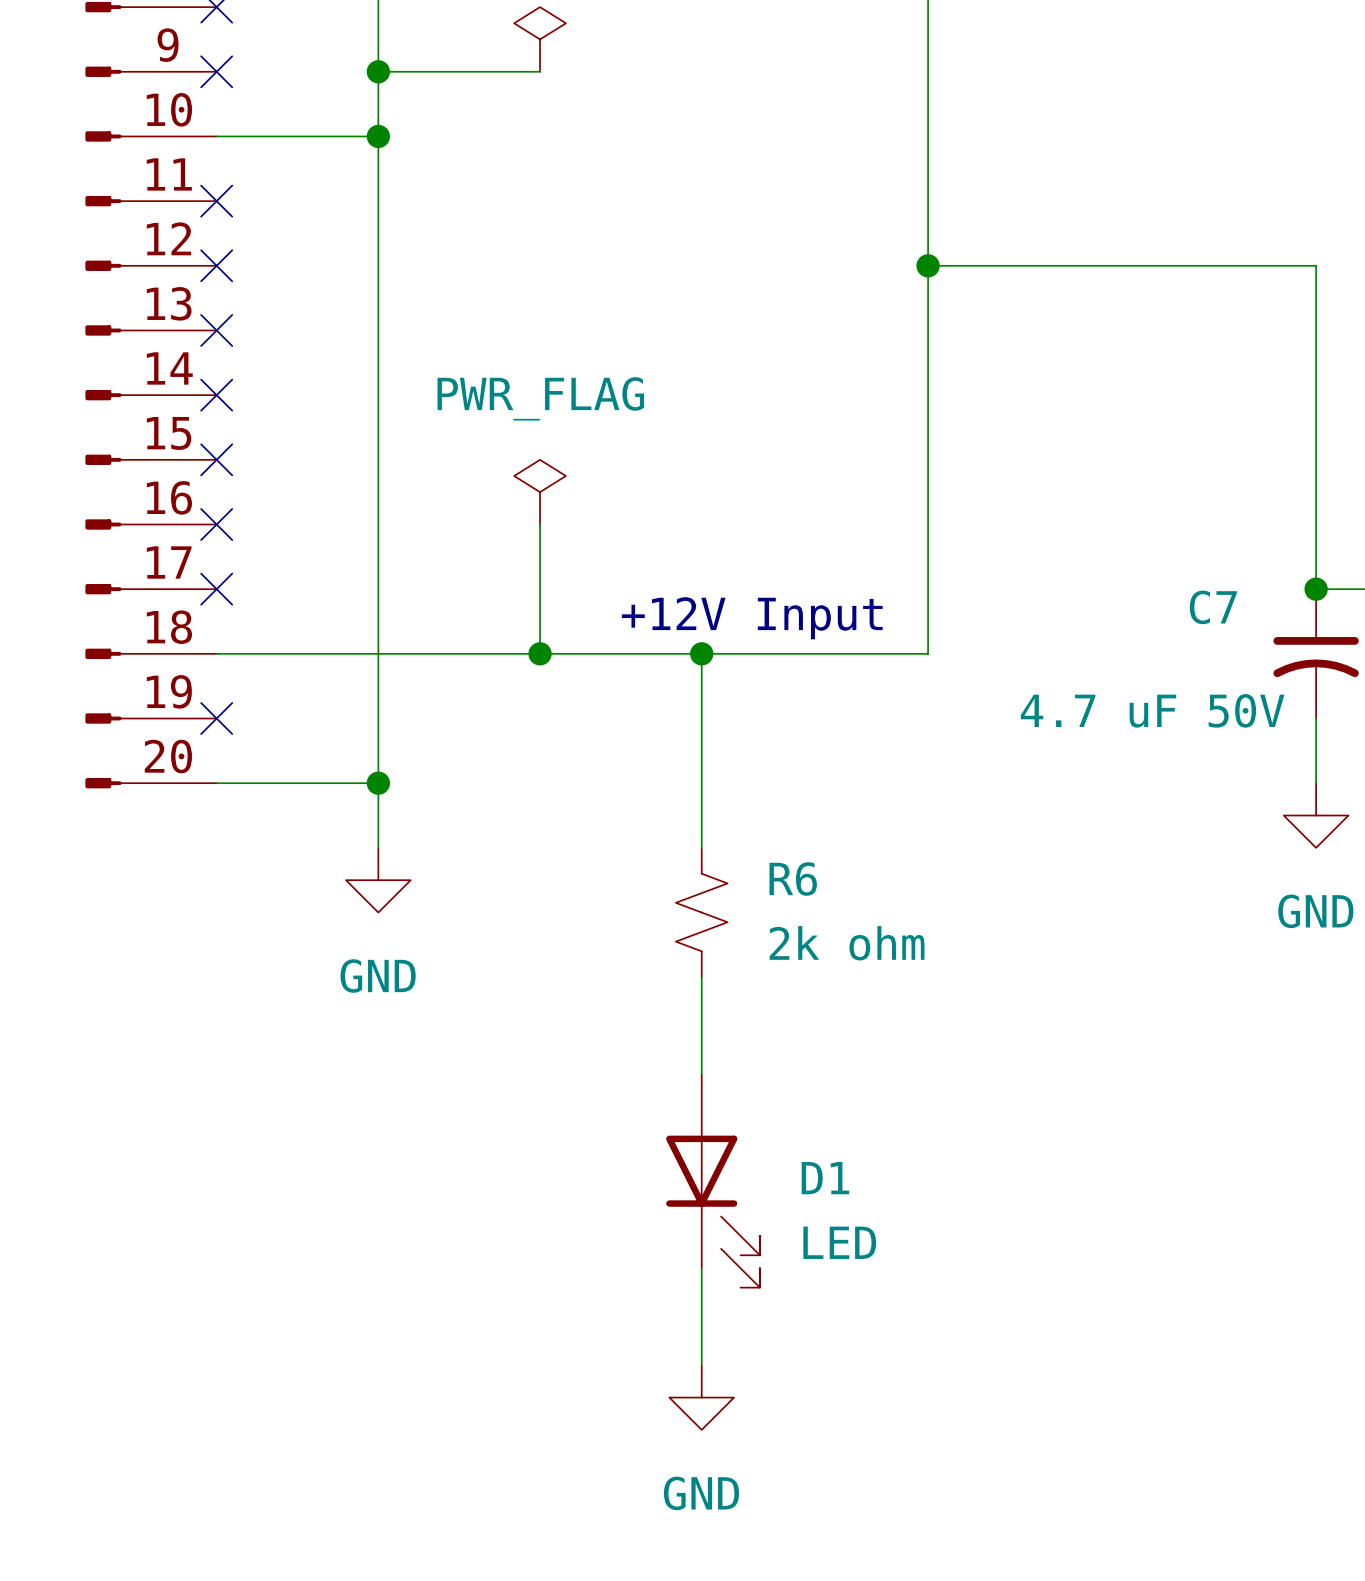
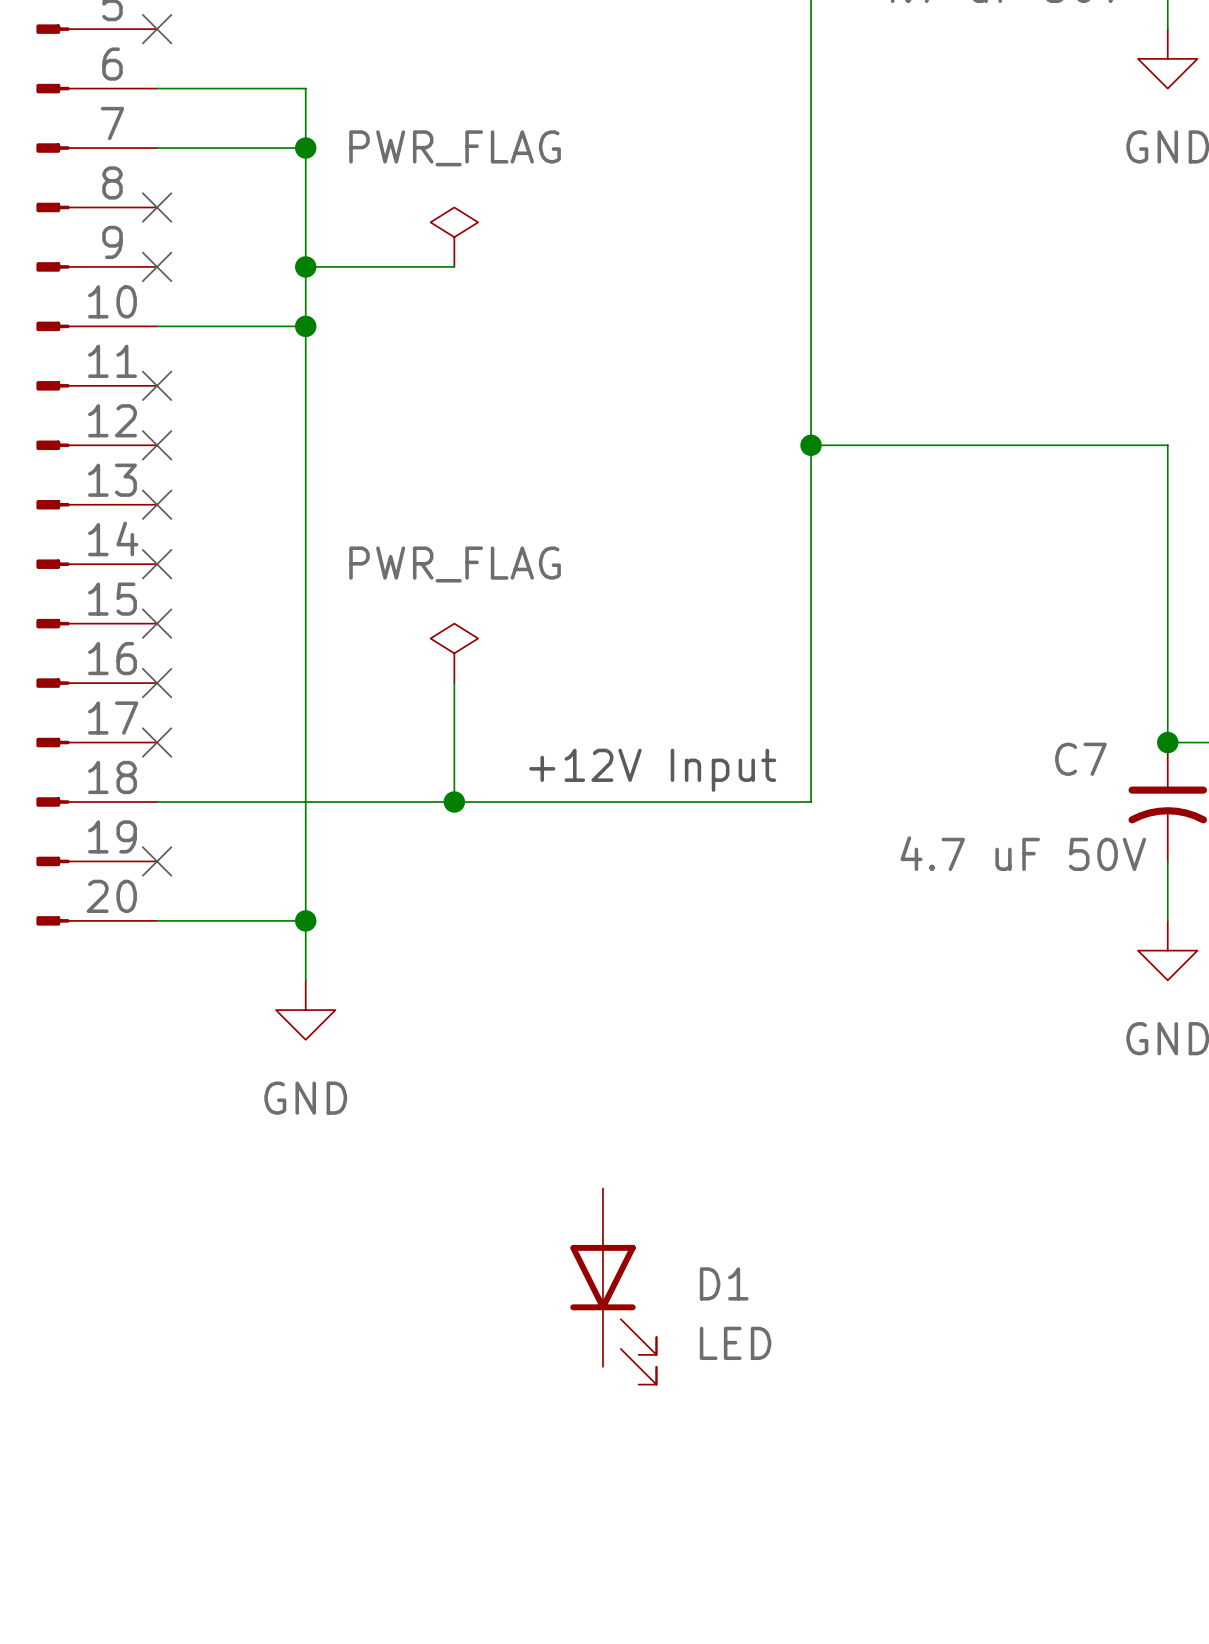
wire: (701, 653) (701, 847) -> none
junction: (701, 653) -> none
R6: 2k ohm (701, 912) -> none
wire: (701, 977) (701, 1074) -> none
wire: (701, 1268) (701, 1365) -> none
power symbol: GND (701, 1397) -> none

